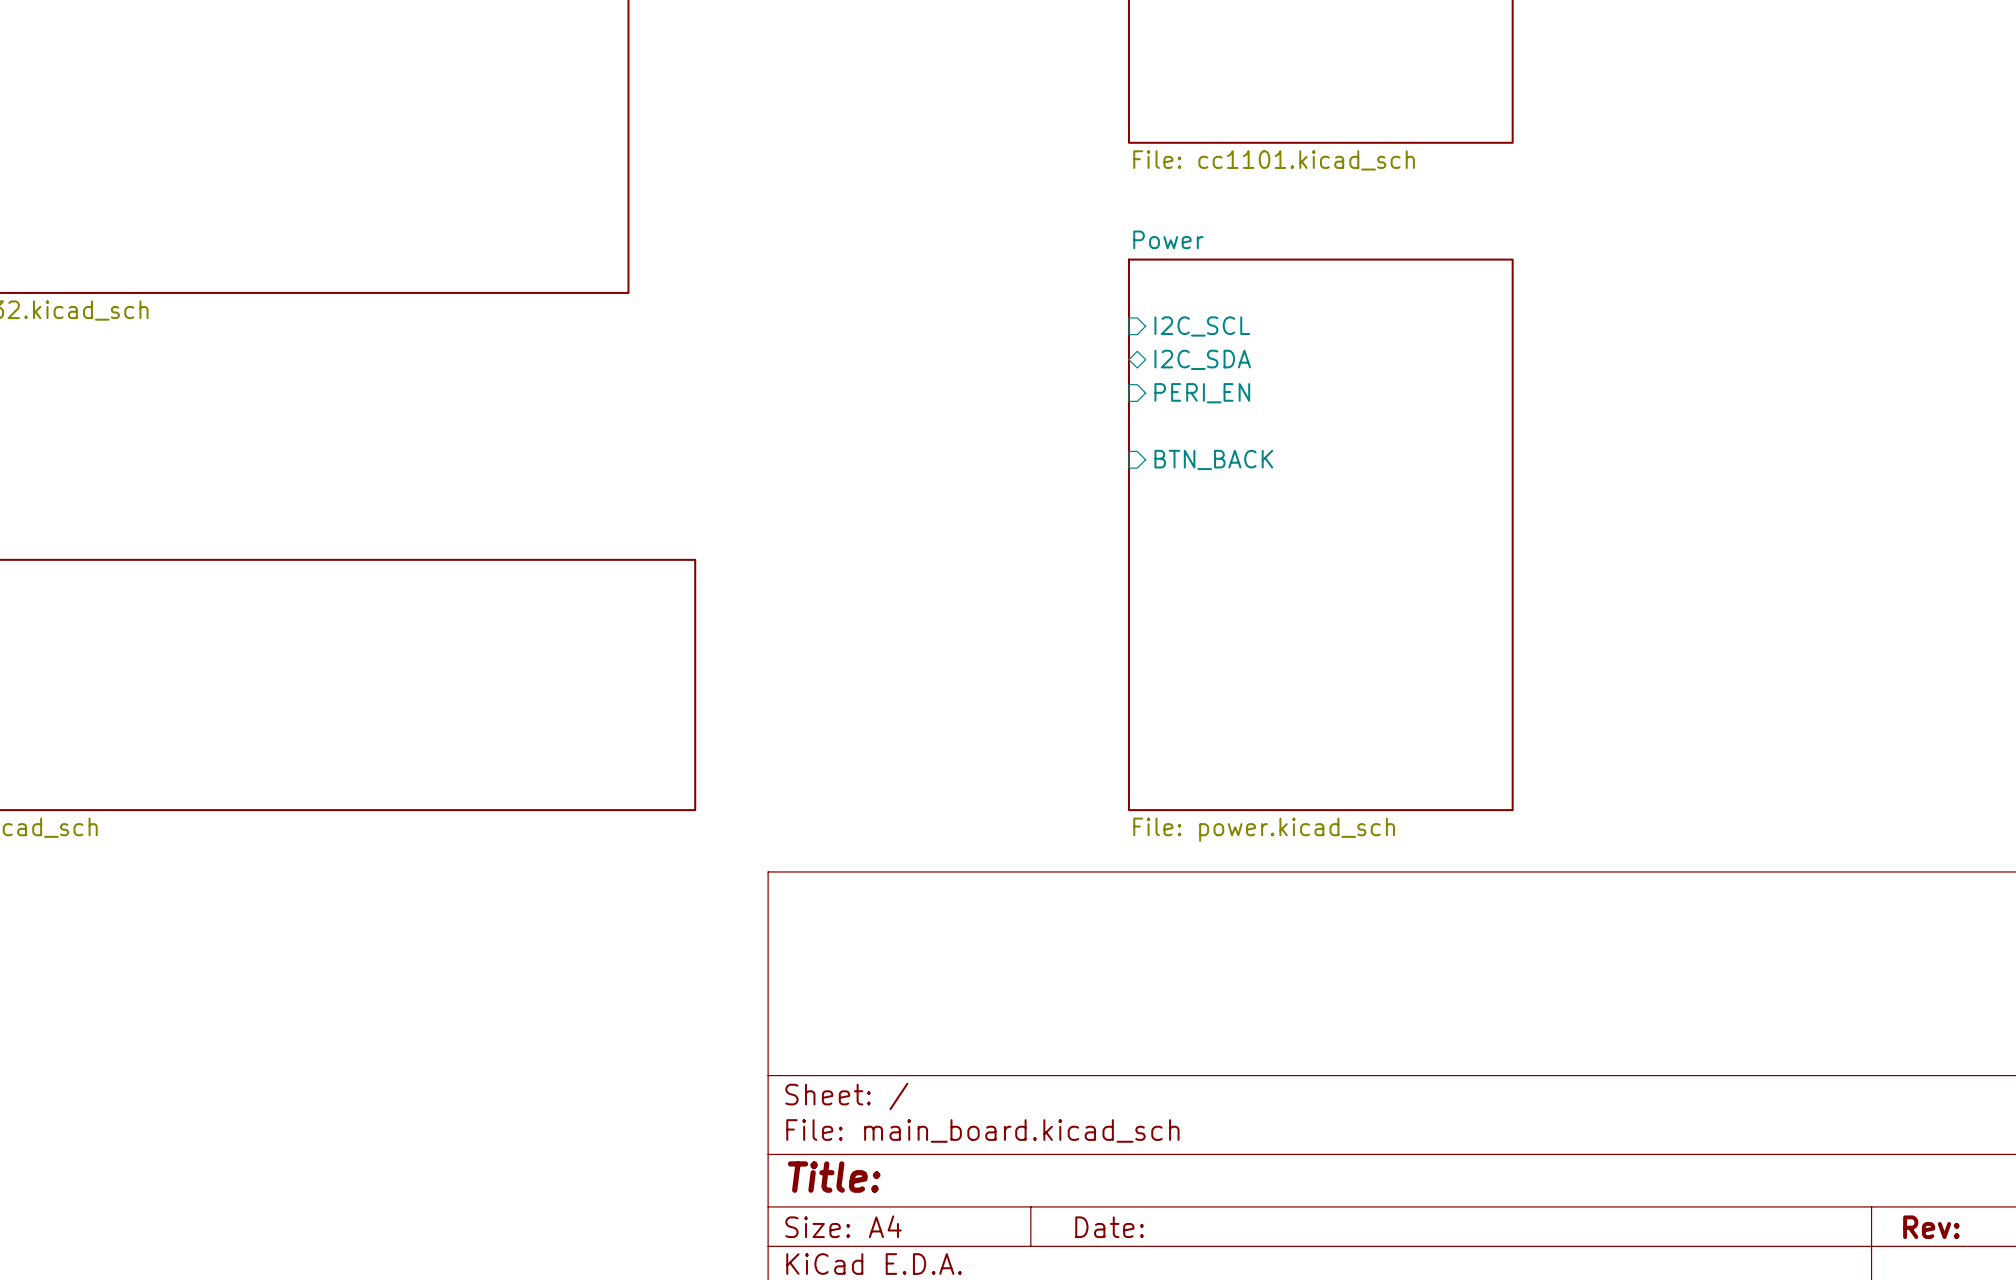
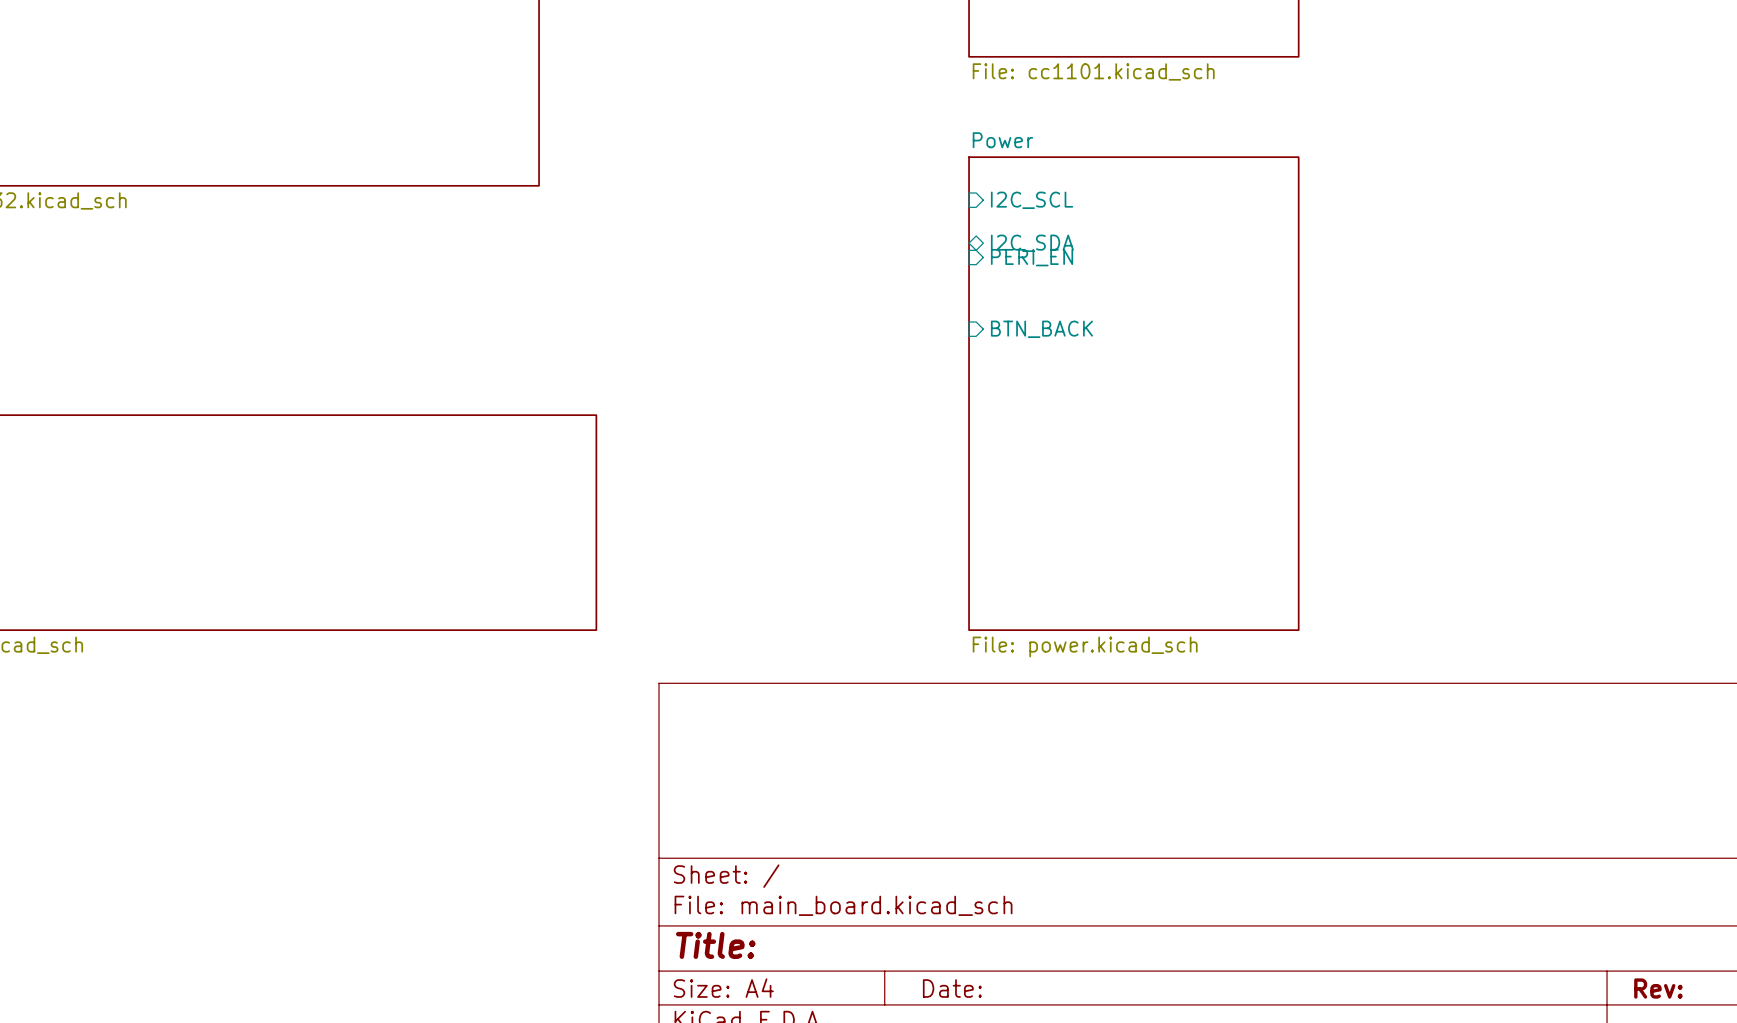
sheet pin position: I2C_SCL (1202, 326) -> I2C_SCL (1032, 200)
sheet pin position: PERI_EN (1202, 393) -> PERI_EN (1032, 257)

